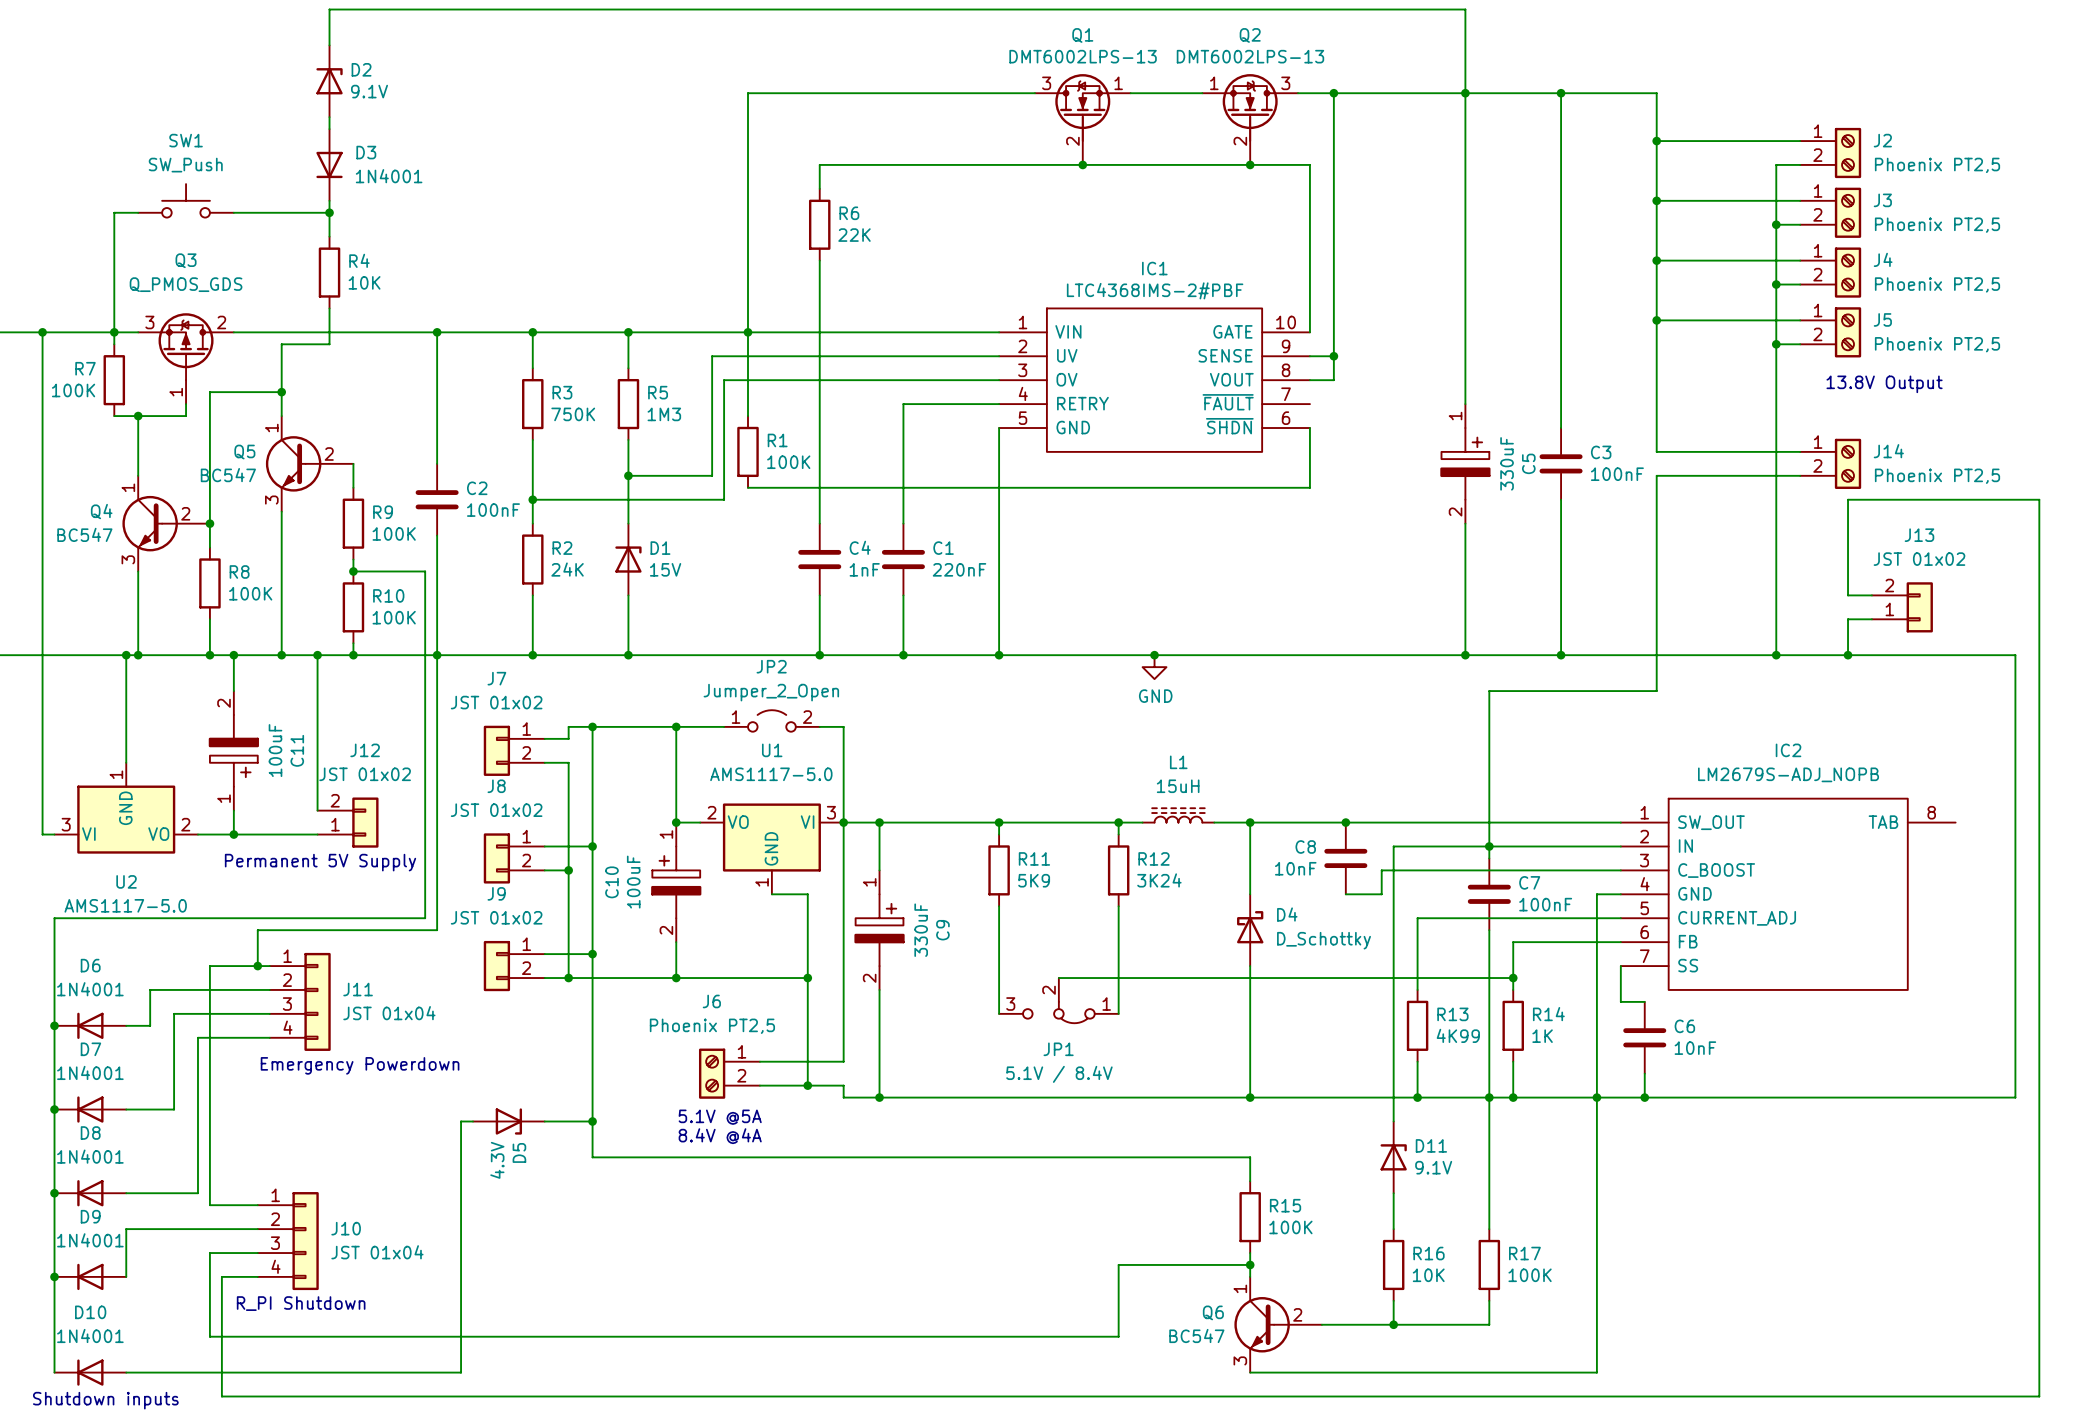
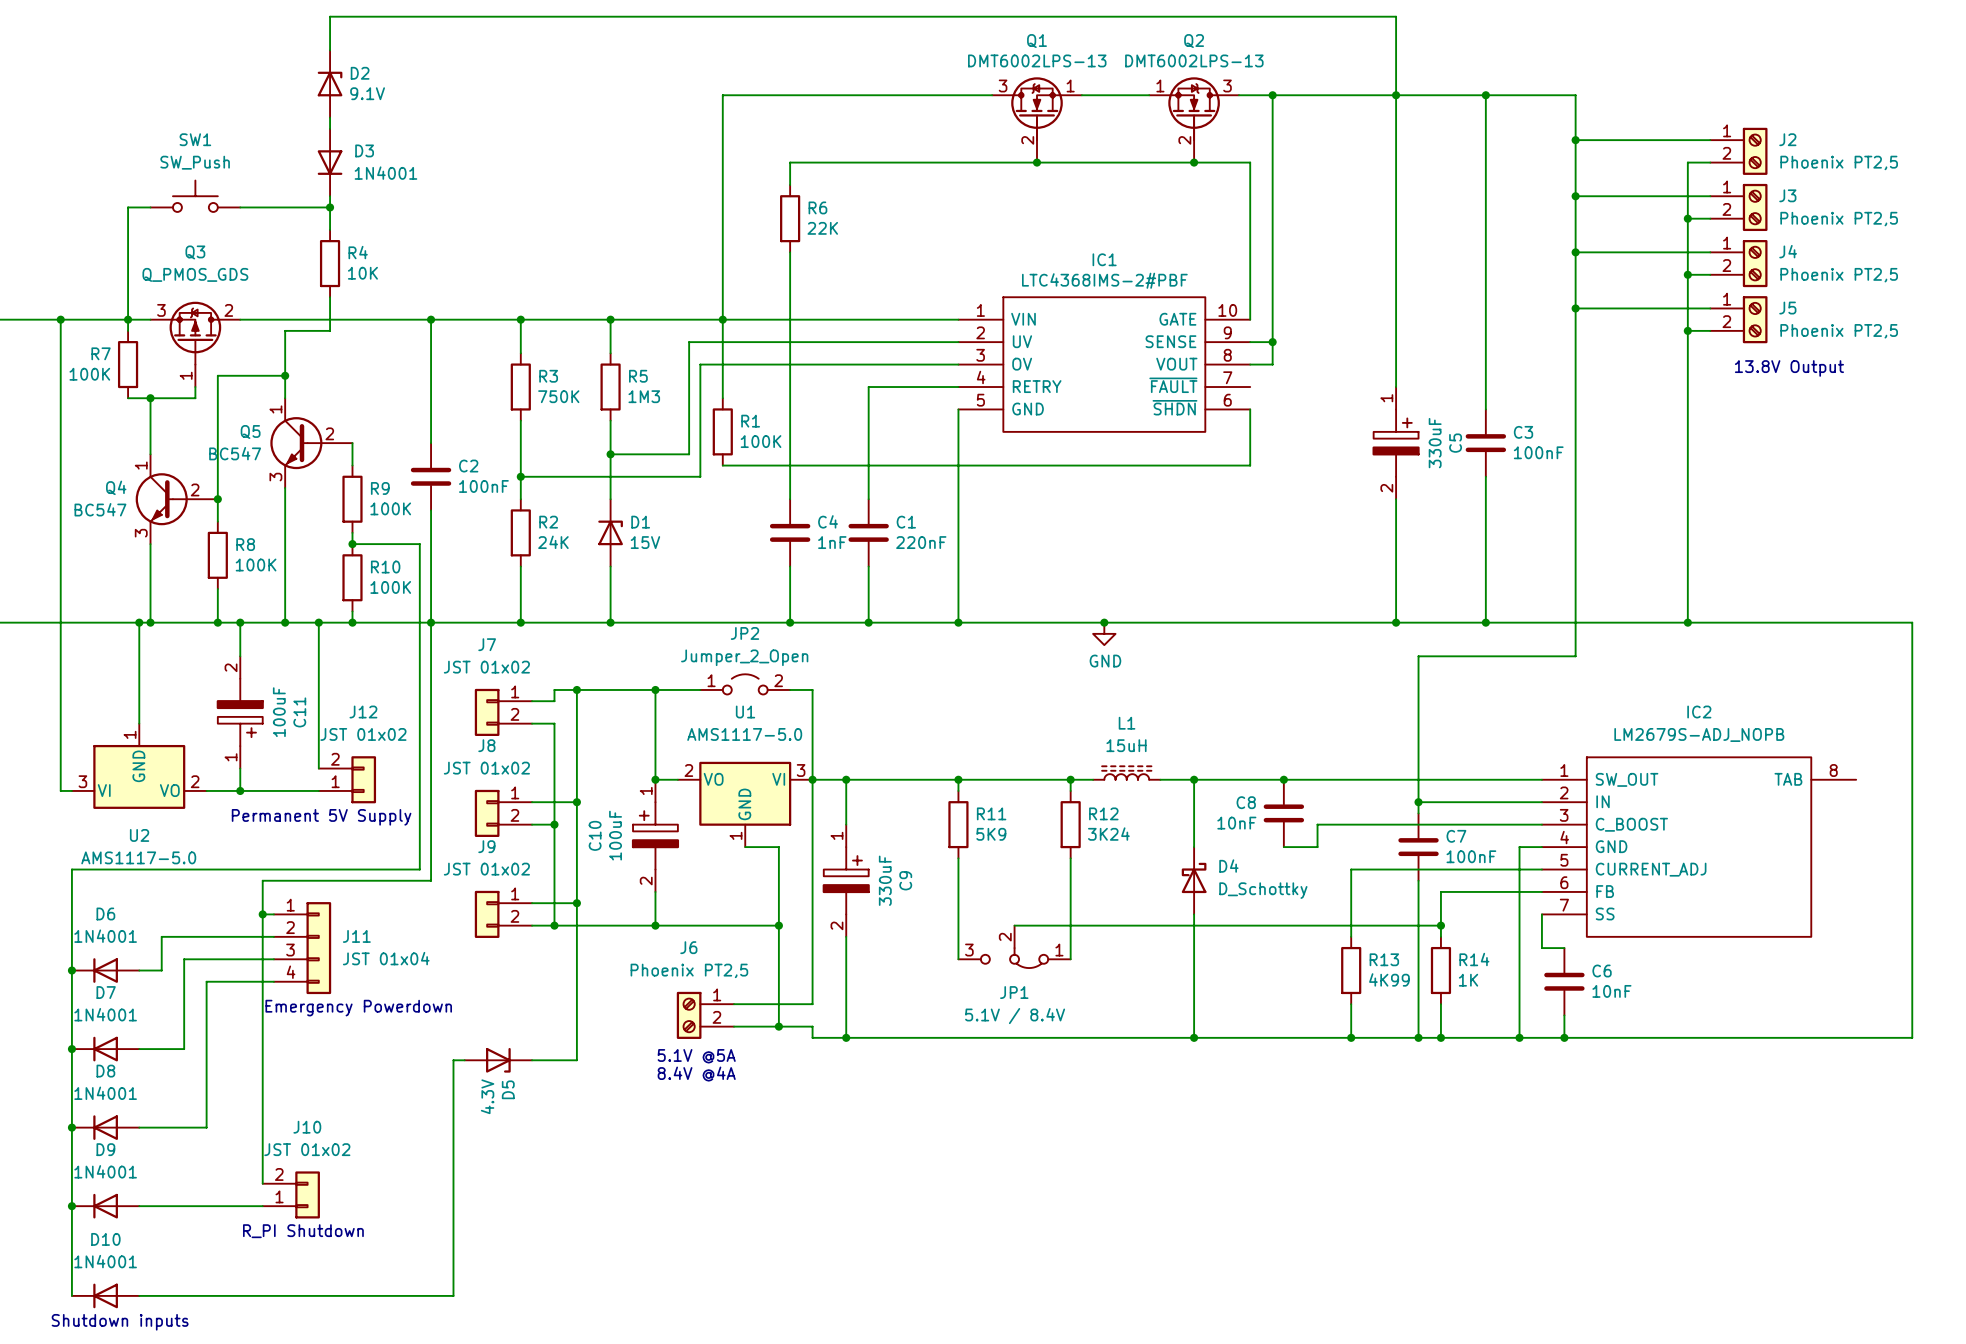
wire: (1656, 451) (1800, 451) -> (1575, 431) (1575, 454)
J14: Phoenix PT2,5 (1830, 463) -> none
wire: (1656, 475) (1800, 475) -> none
wire: (1871, 595) (1848, 595) (1848, 499) (2039, 499) (2039, 1396) (221, 1396) (221, 1276) -> none
J13: JST 01x02 (1902, 607) -> none
wire: (1871, 619) (1848, 619) (1848, 655) -> none
junction: (1848, 655) -> none
wire: (1489, 846) (1393, 846) (1393, 1121) -> none
wire: (257, 966) (209, 966) (209, 1205) (257, 1205) -> (262, 914) (262, 1183)
wire: (1489, 1097) (1489, 1229) -> none
wire: (1596, 1097) (1596, 1372) (1250, 1372) -> none
wire: (592, 1121) (592, 1157) (1250, 1157) (1250, 1181) -> none
junction: (592, 1121) -> none
D11: 9.1V (1393, 1157) -> none
J10 symbol: [257, 1192, 319, 1291] -> [262, 1171, 320, 1219]
wire: (1393, 1193) (1393, 1229) -> none
R15: 100K (1250, 1217) -> none
J10 name position: J10 (346, 1228) -> J10 (307, 1127)
wire: (257, 1229) (126, 1229) (126, 1276) -> (229, 1206) (139, 1206)
J10 value: JST 01x04 (377, 1252) -> JST 01x02 (307, 1149)
wire: (257, 1253) (209, 1253) (209, 1336) (1118, 1336) (1118, 1264) (1250, 1264) -> none
wire: (1250, 1253) (1250, 1276) -> none
junction: (1250, 1264) -> none
R16: 10K (1393, 1264) -> none
R17: 100K (1489, 1264) -> none
wire: (1393, 1300) (1393, 1324) -> none
wire: (1489, 1300) (1489, 1324) (1321, 1324) -> none
Q6: BC547 (1278, 1324) -> none
junction: (1393, 1324) -> none

